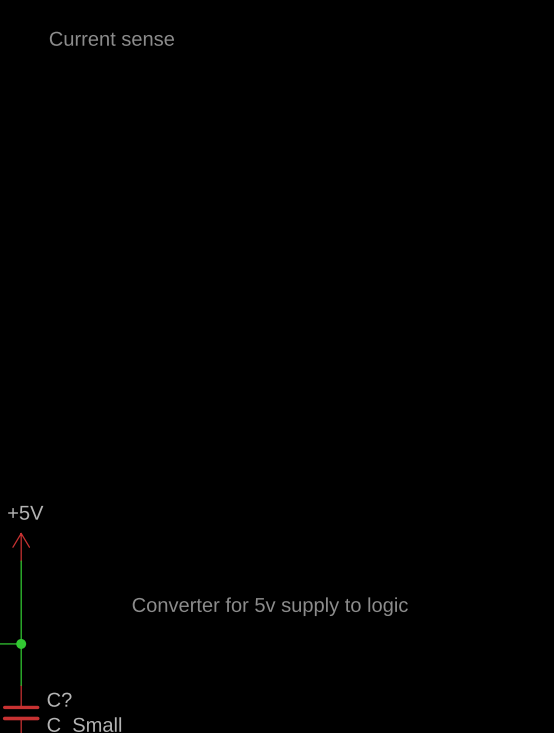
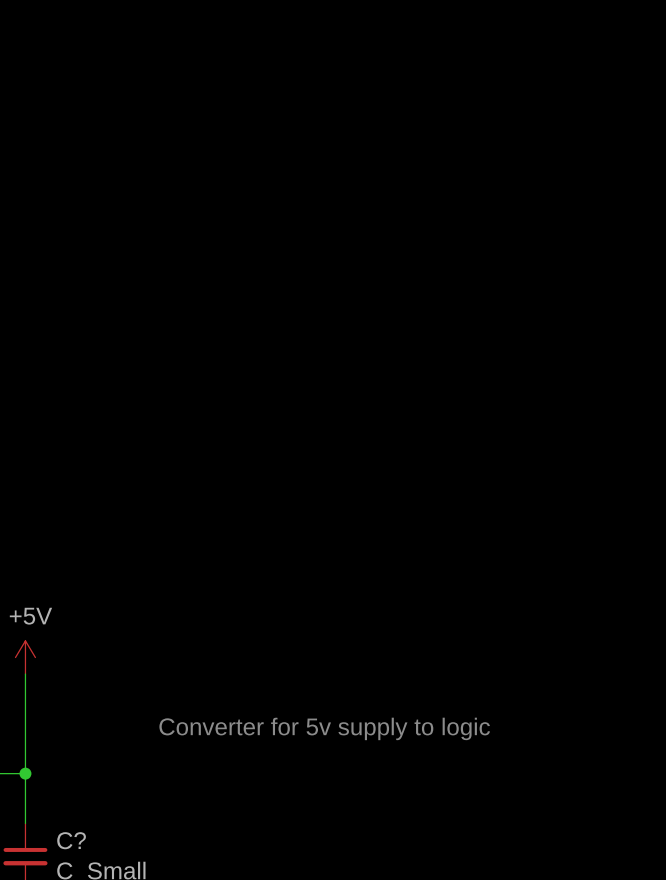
text: Current sense (111, 38) -> none

